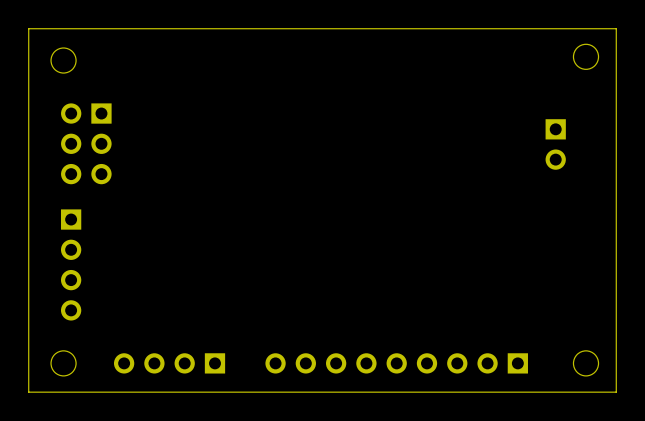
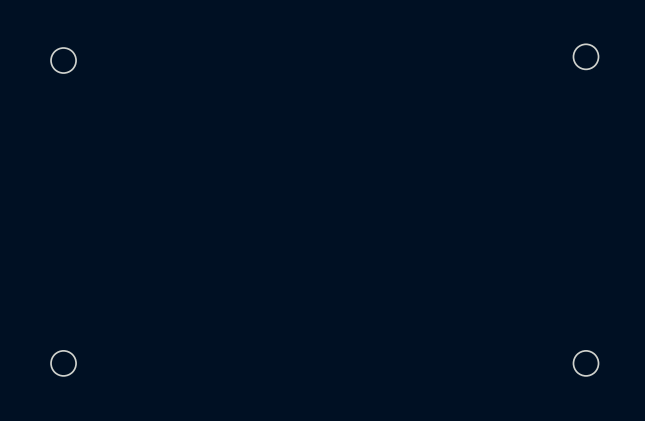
board edge: (616, 28) (28, 28) (28, 392) (616, 392) (616, 28) -> none
part: (86, 143) -> none
part: (555, 144) -> none
part: (71, 264) -> none
part: (169, 363) -> none
part: (396, 363) -> none

